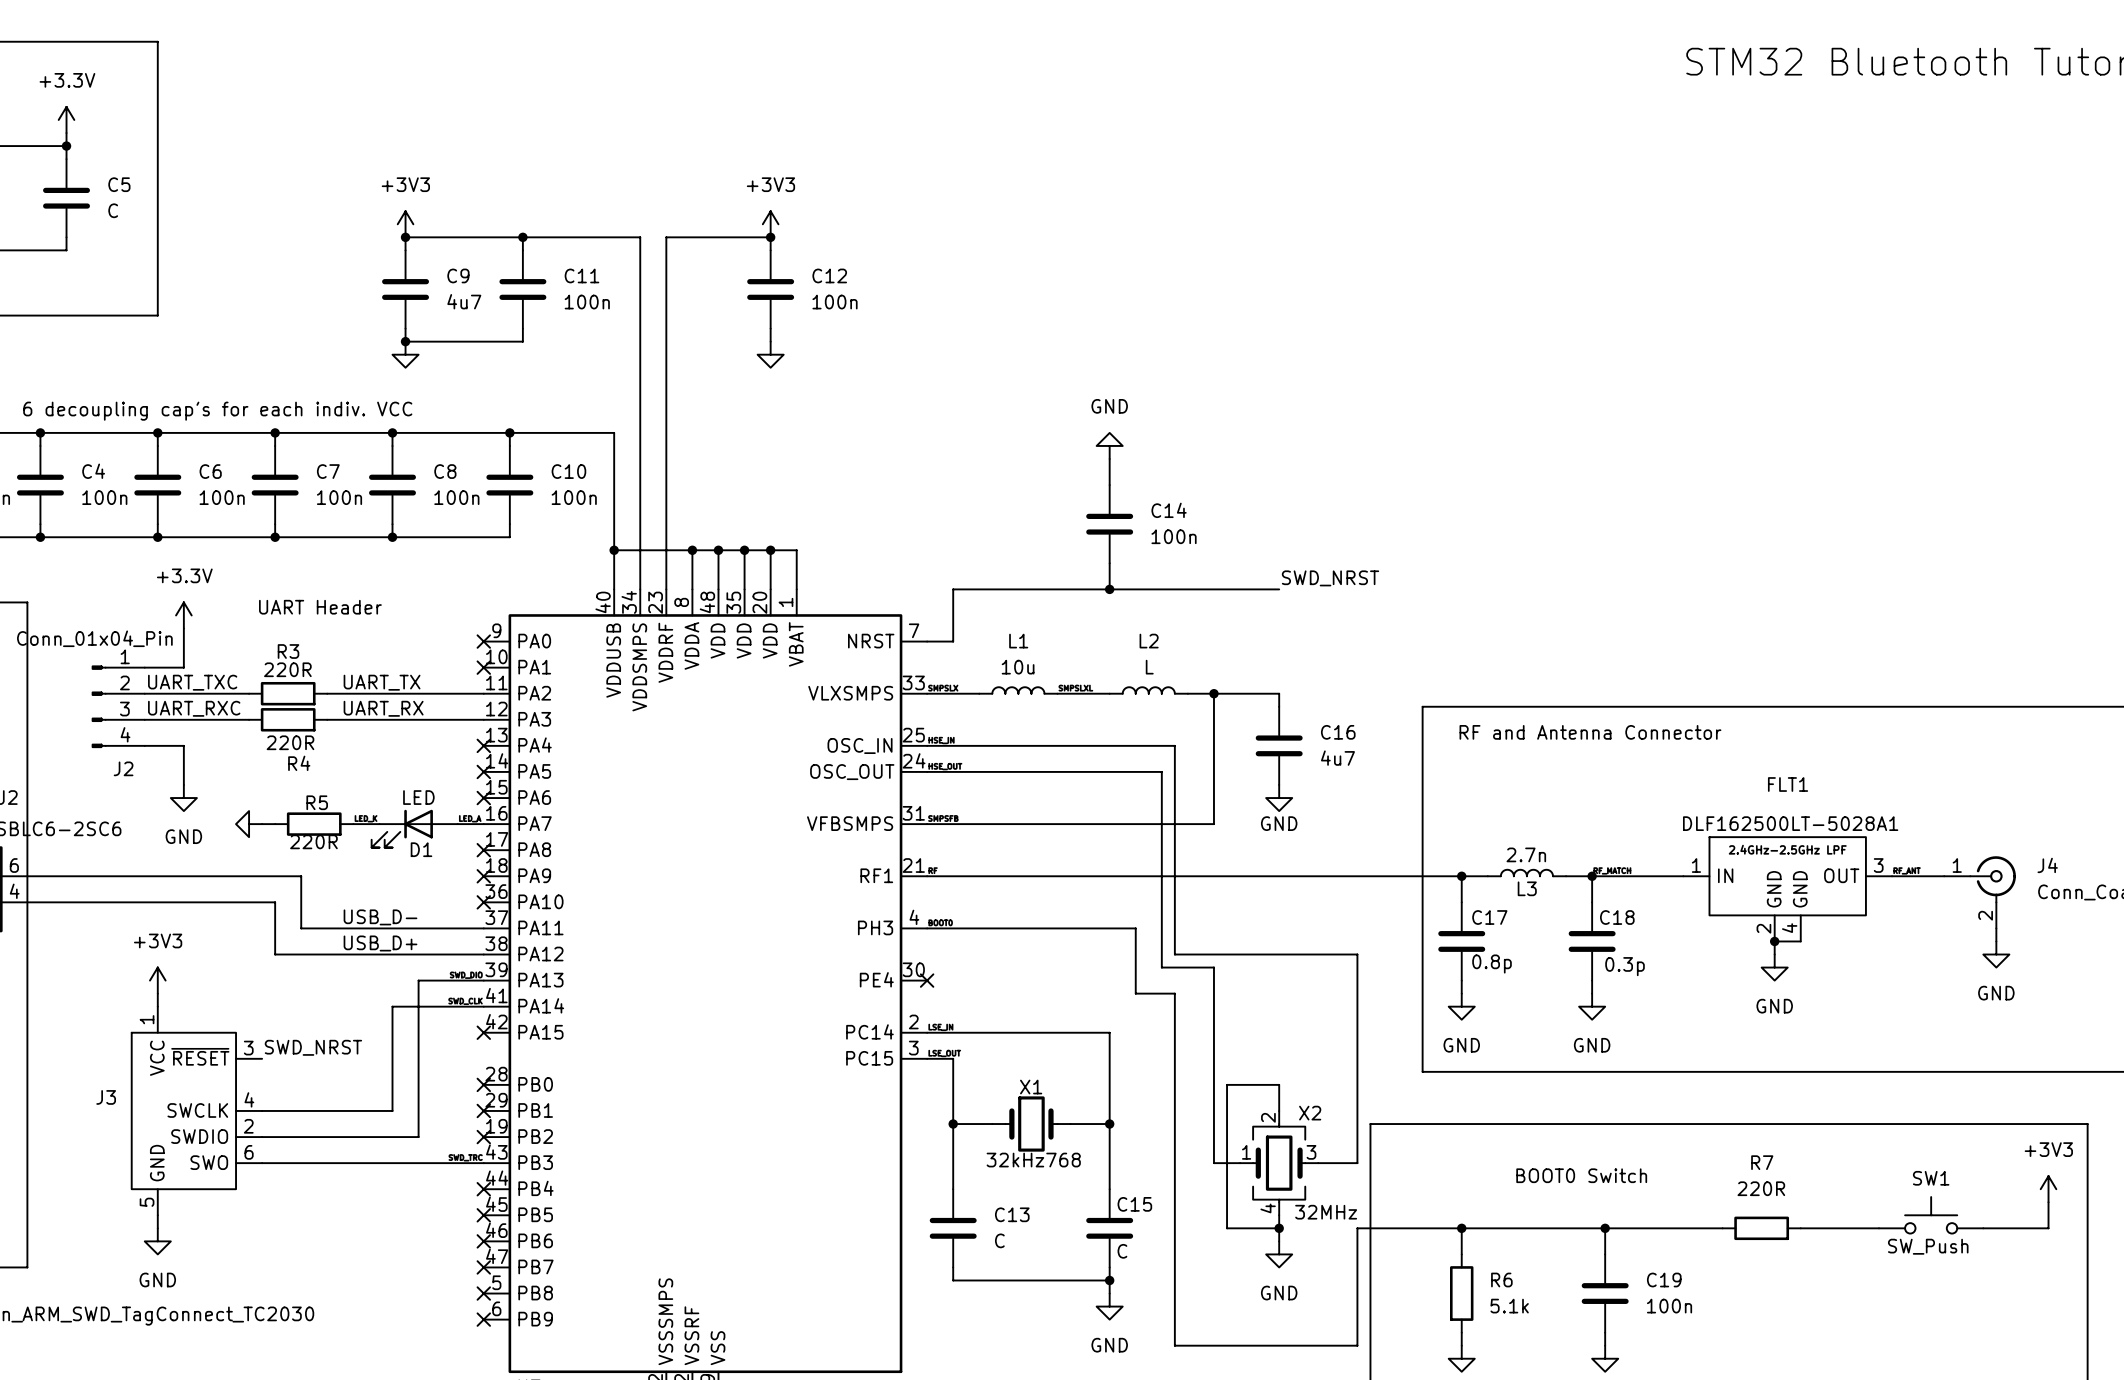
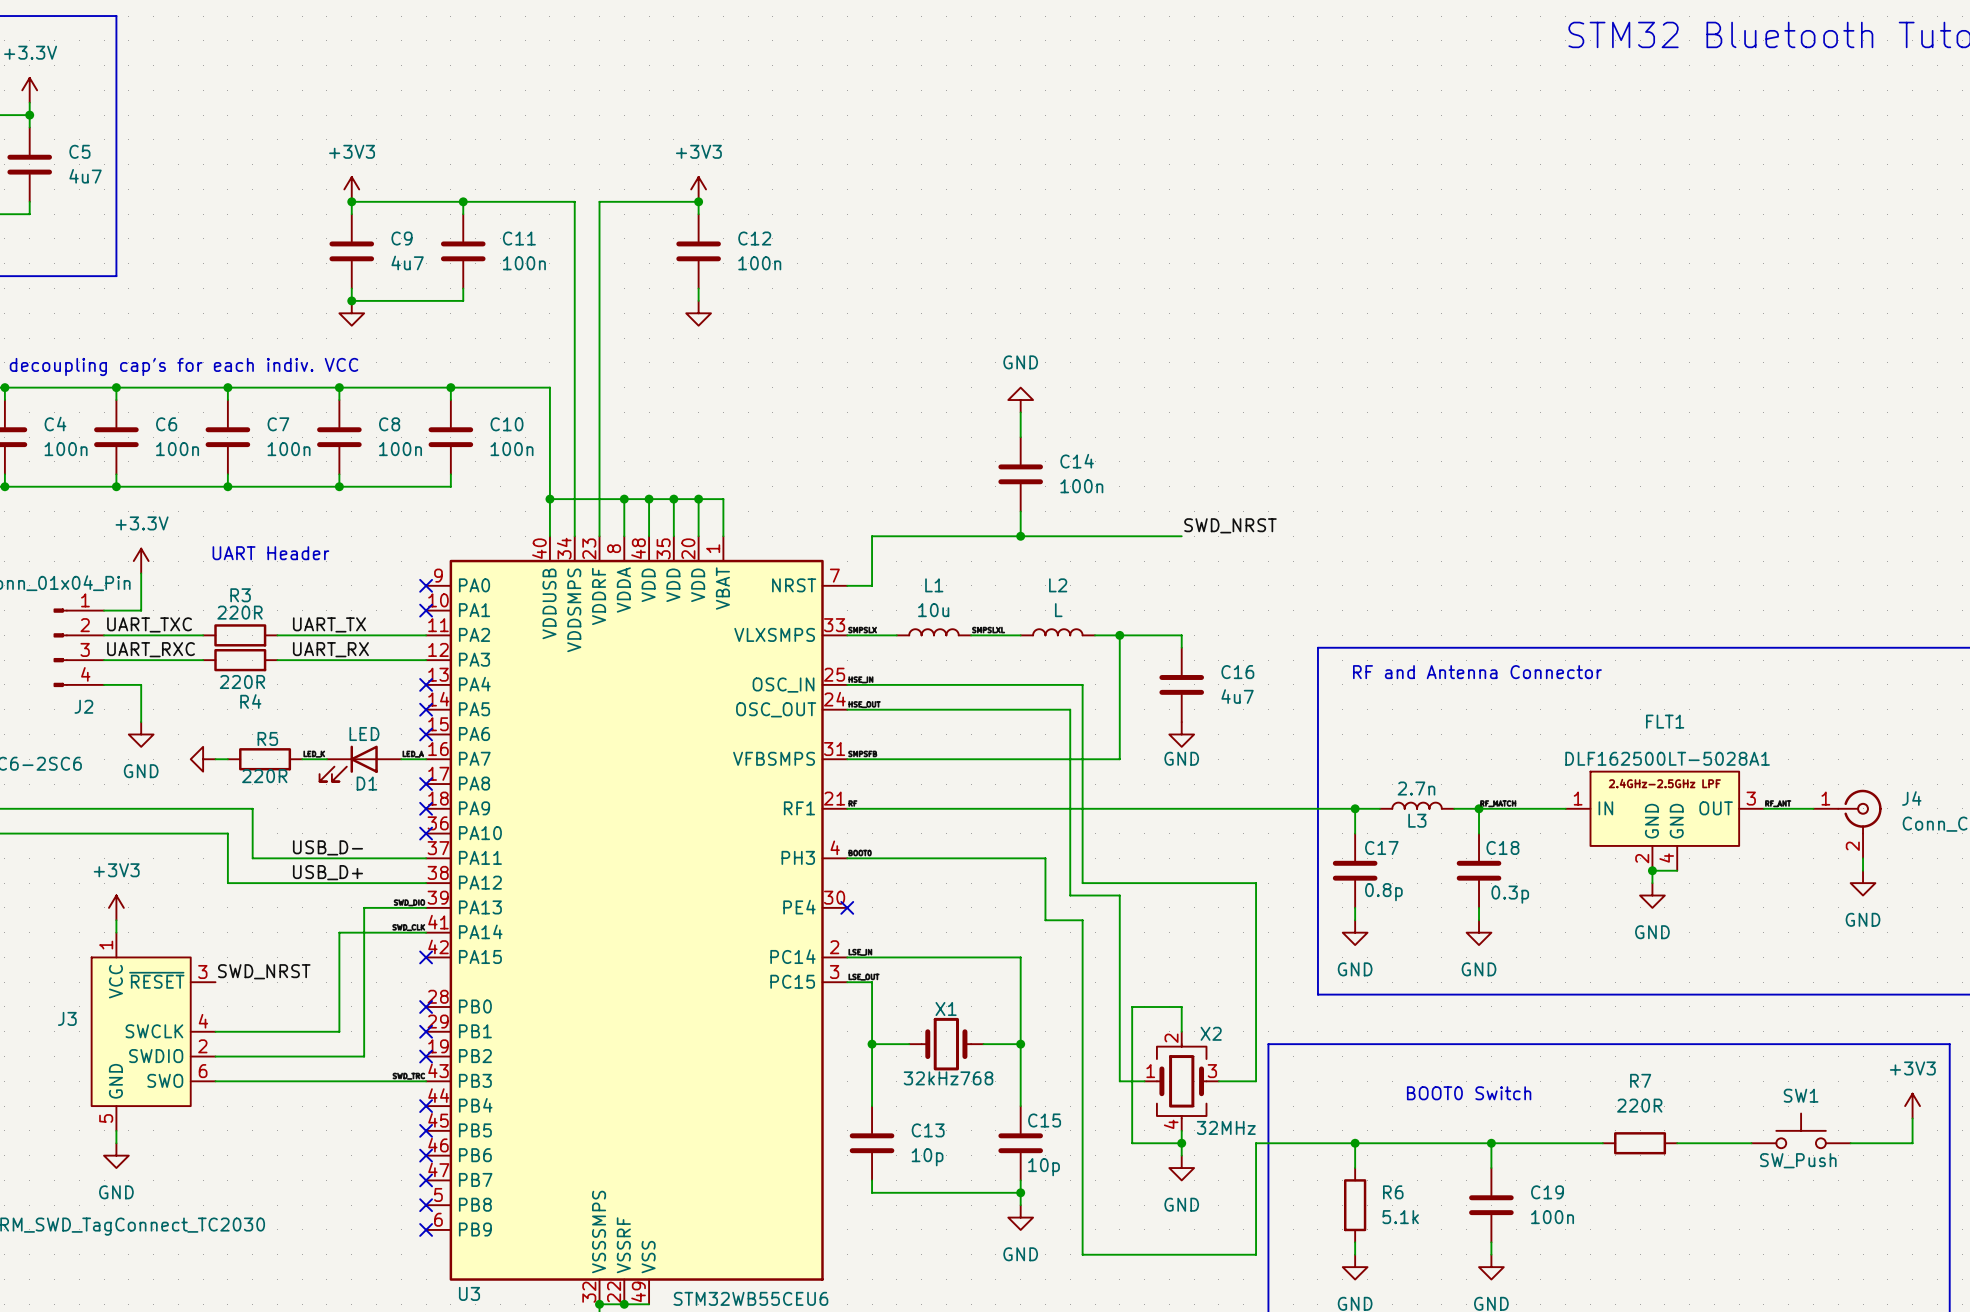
C5 value: C (113, 210) -> 4u7 (85, 176)
C13 value: C (999, 1240) -> 10p (927, 1157)
C15 value: C (1122, 1251) -> 10p (1044, 1167)

